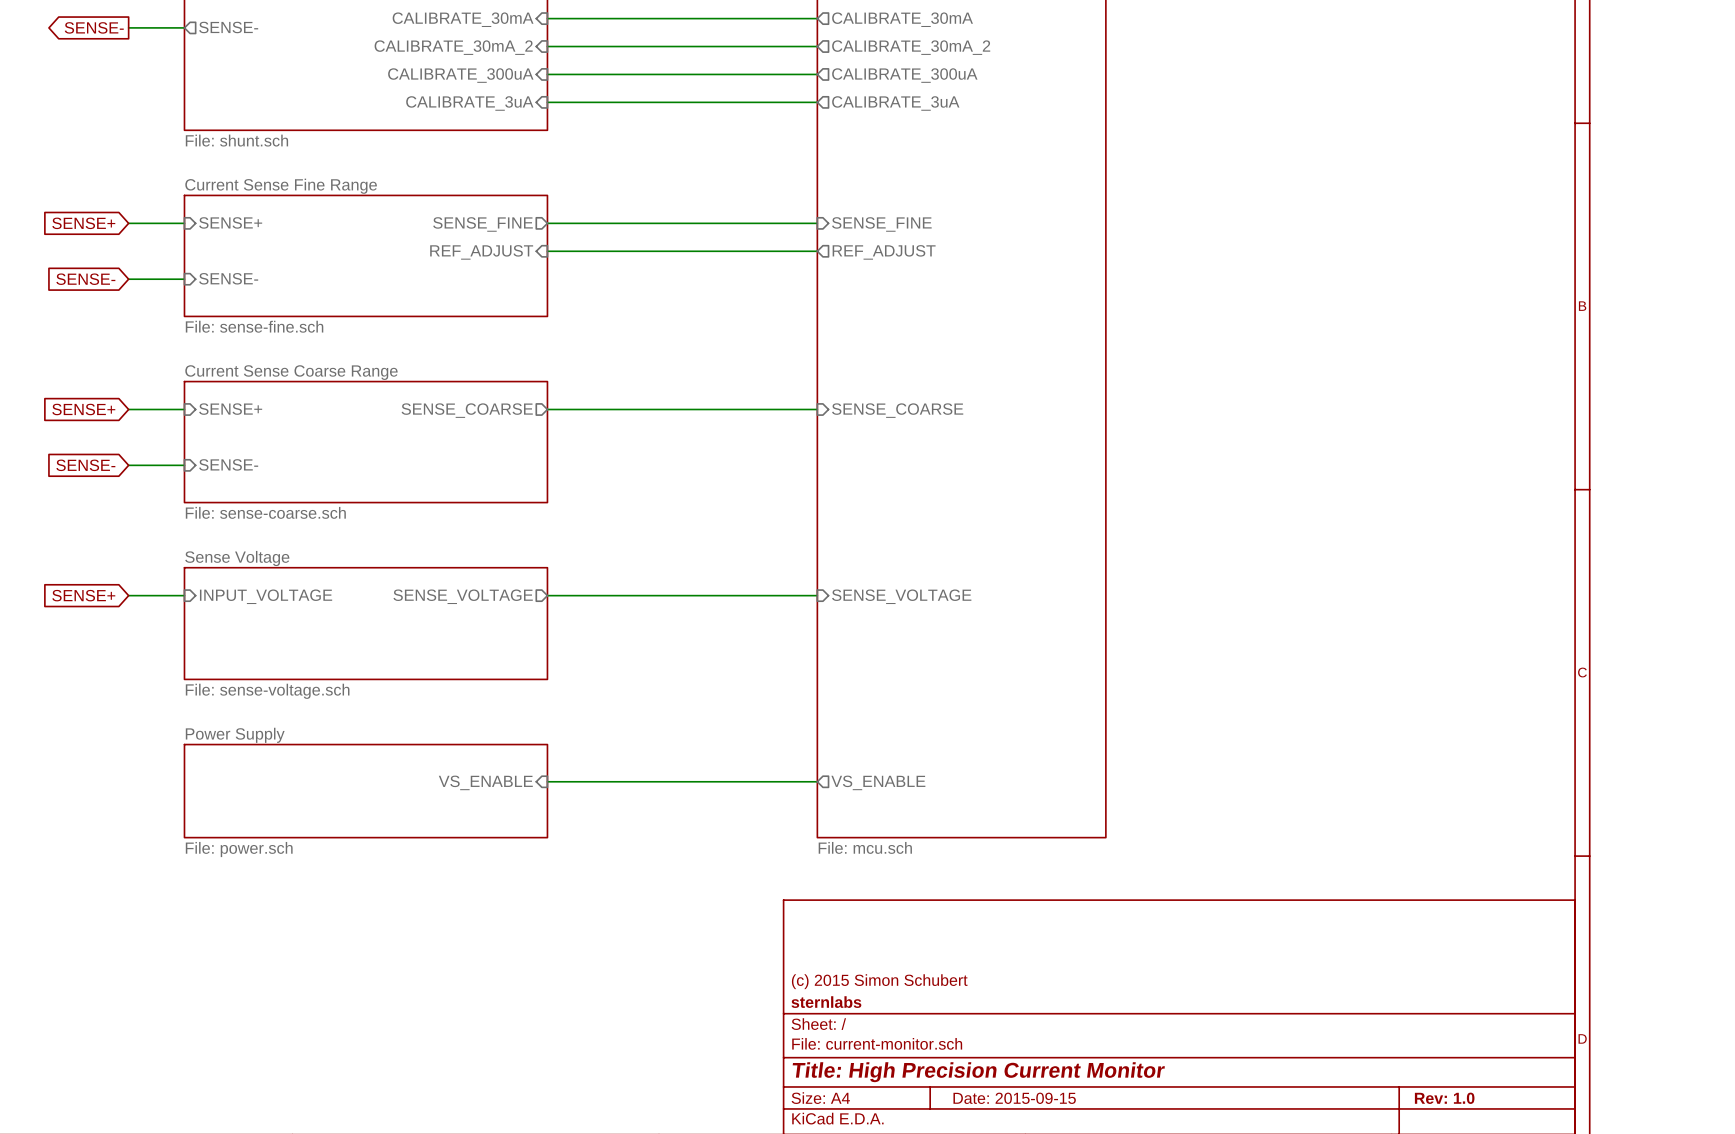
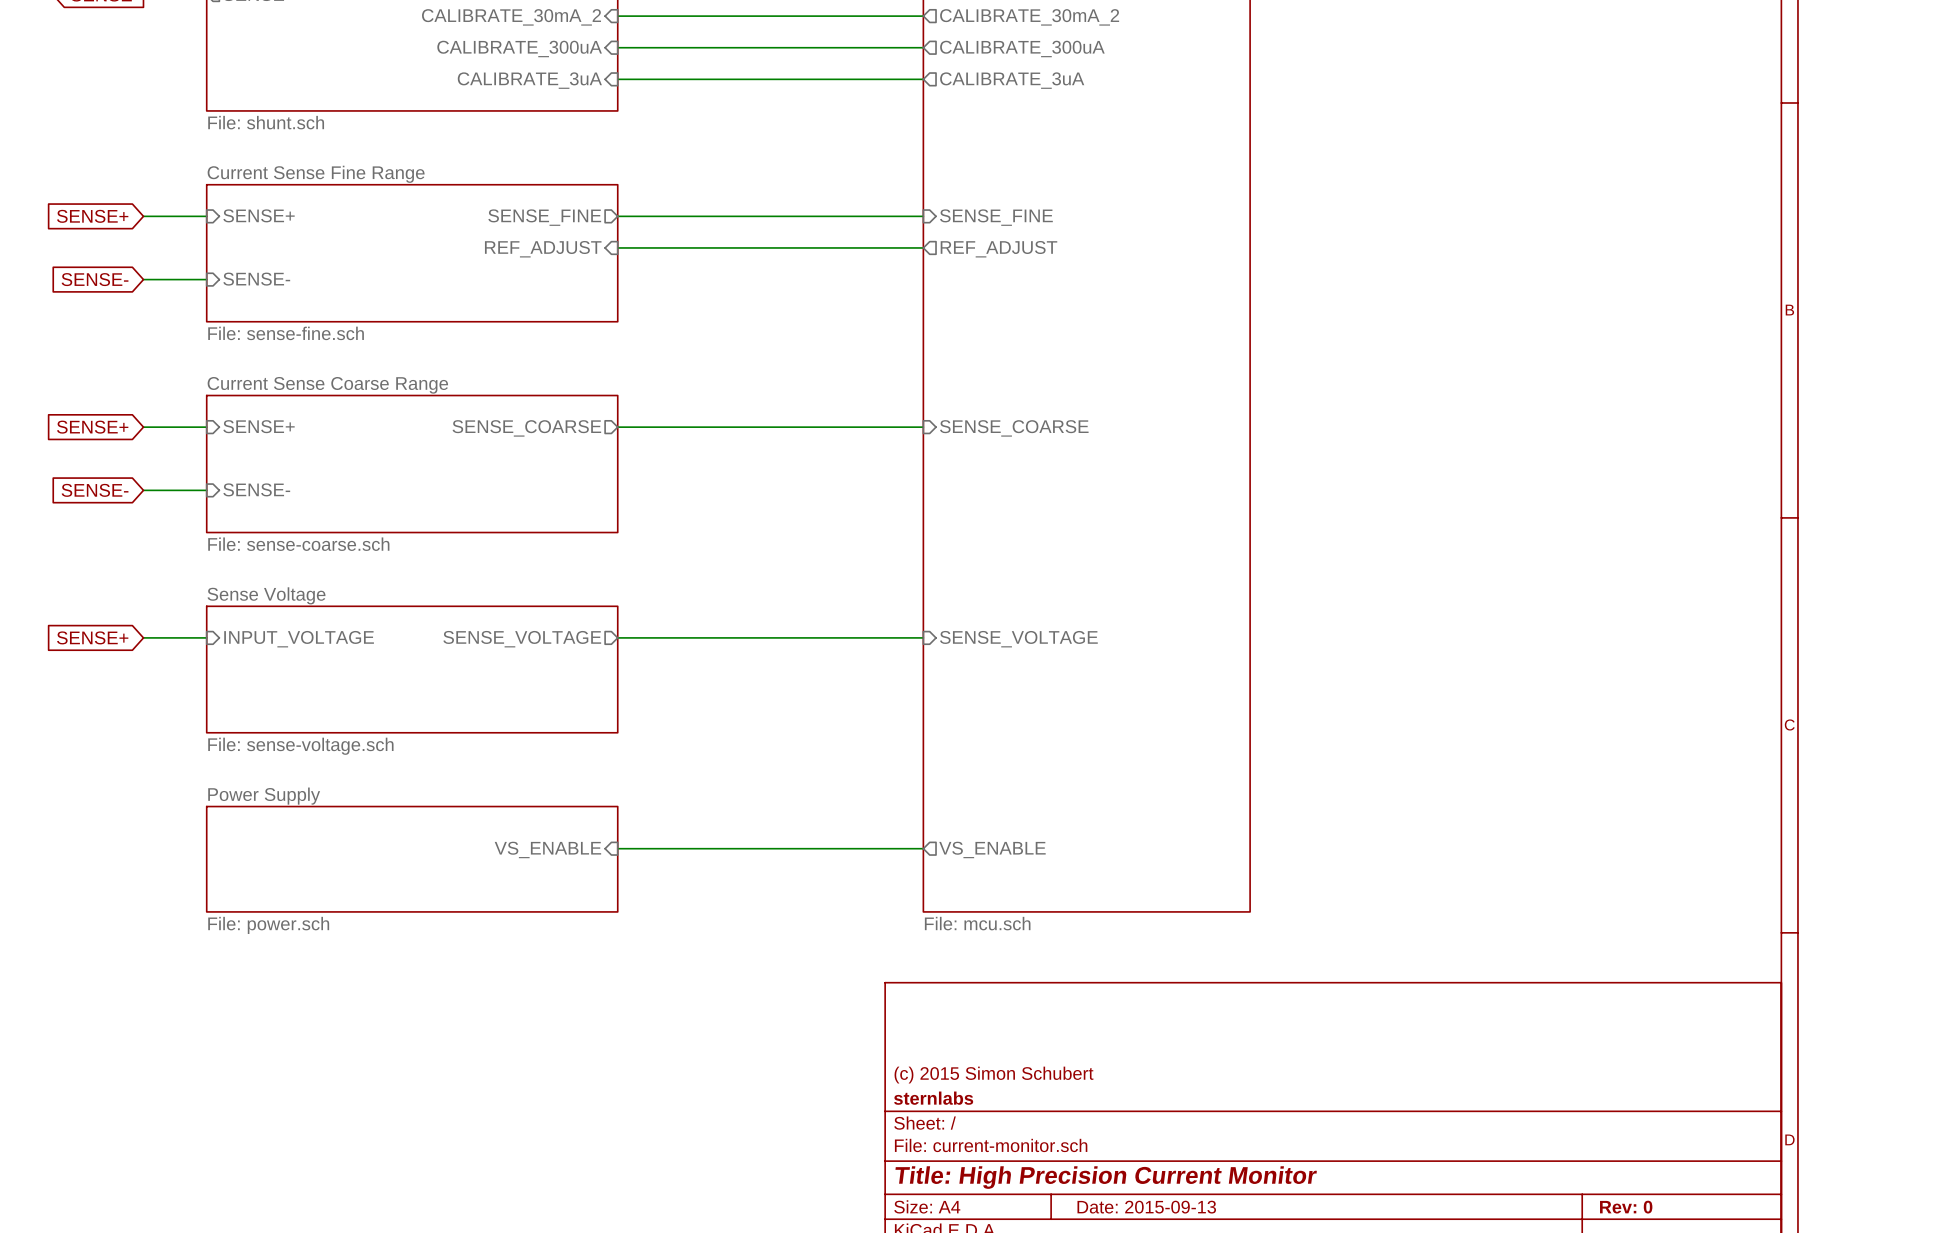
title block: Date: 2015-09-15 (1014, 1098) -> Date: 2015-09-13 (1146, 1207)
title block: Rev: 1.0 (1444, 1098) -> Rev: 0 (1626, 1207)

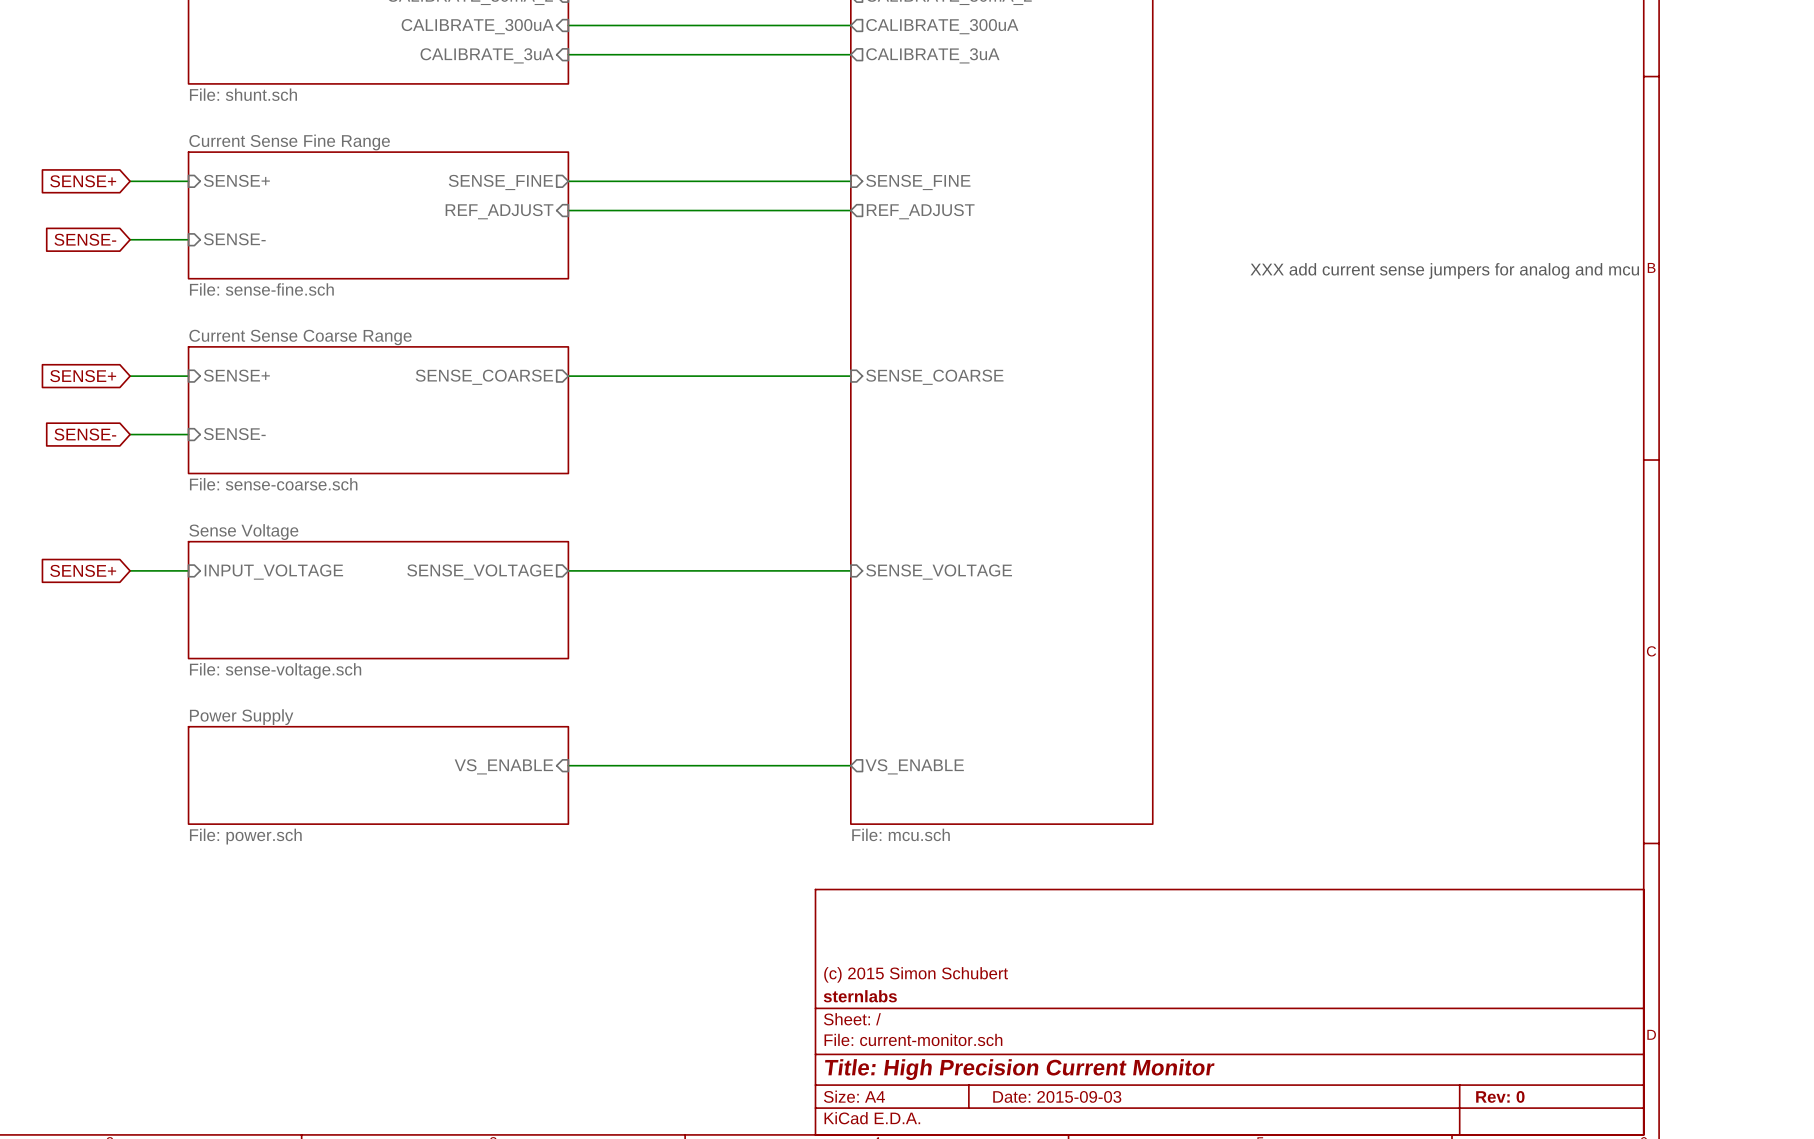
text: none -> XXX add current sense jumpers for analog and mcu (1444, 270)
title block: Date: 2015-09-13 (1146, 1207) -> Date: 2015-09-03 (1057, 1096)

